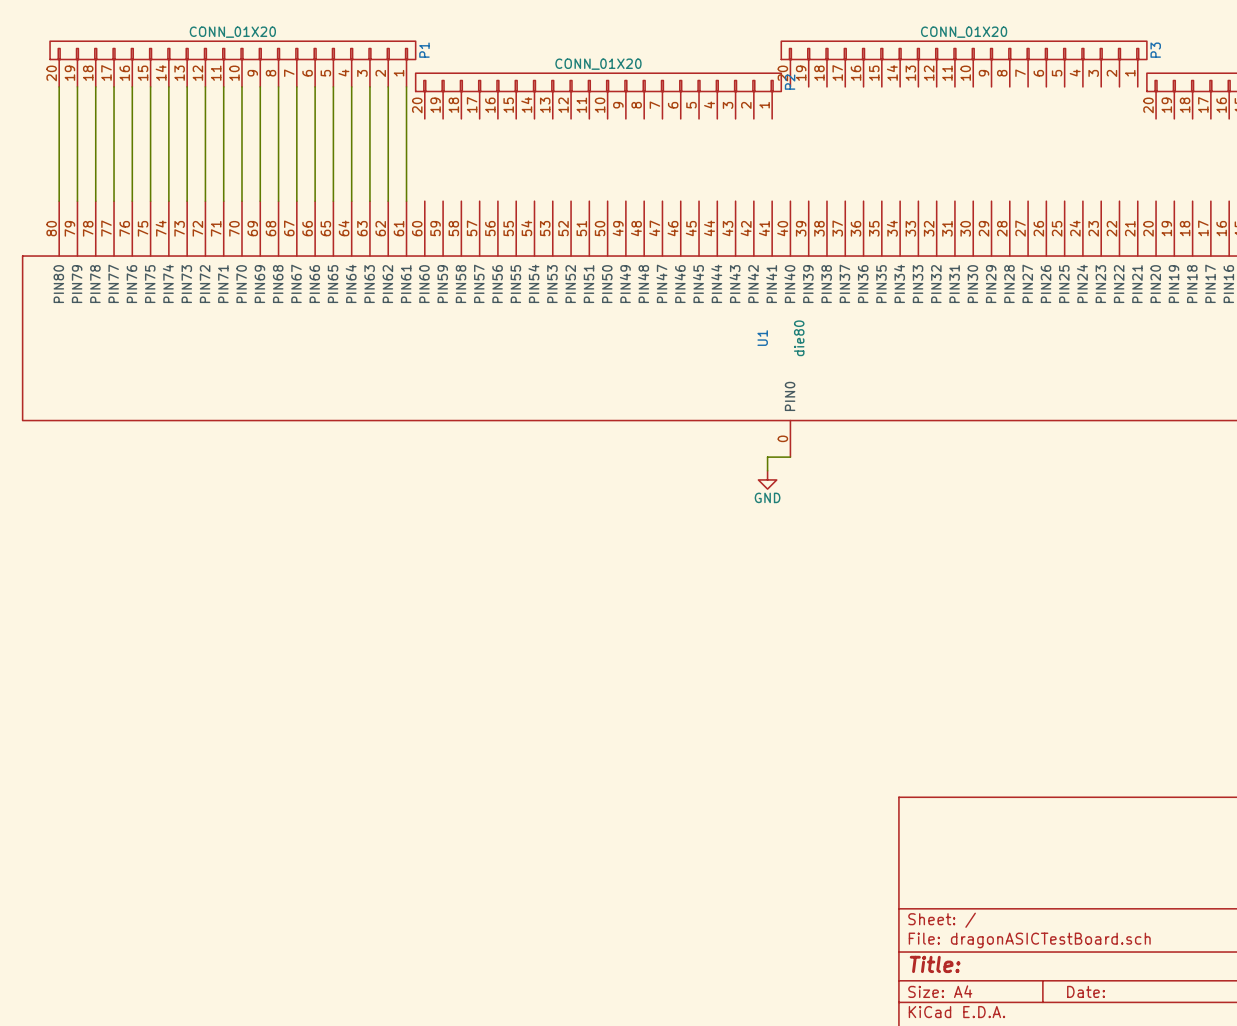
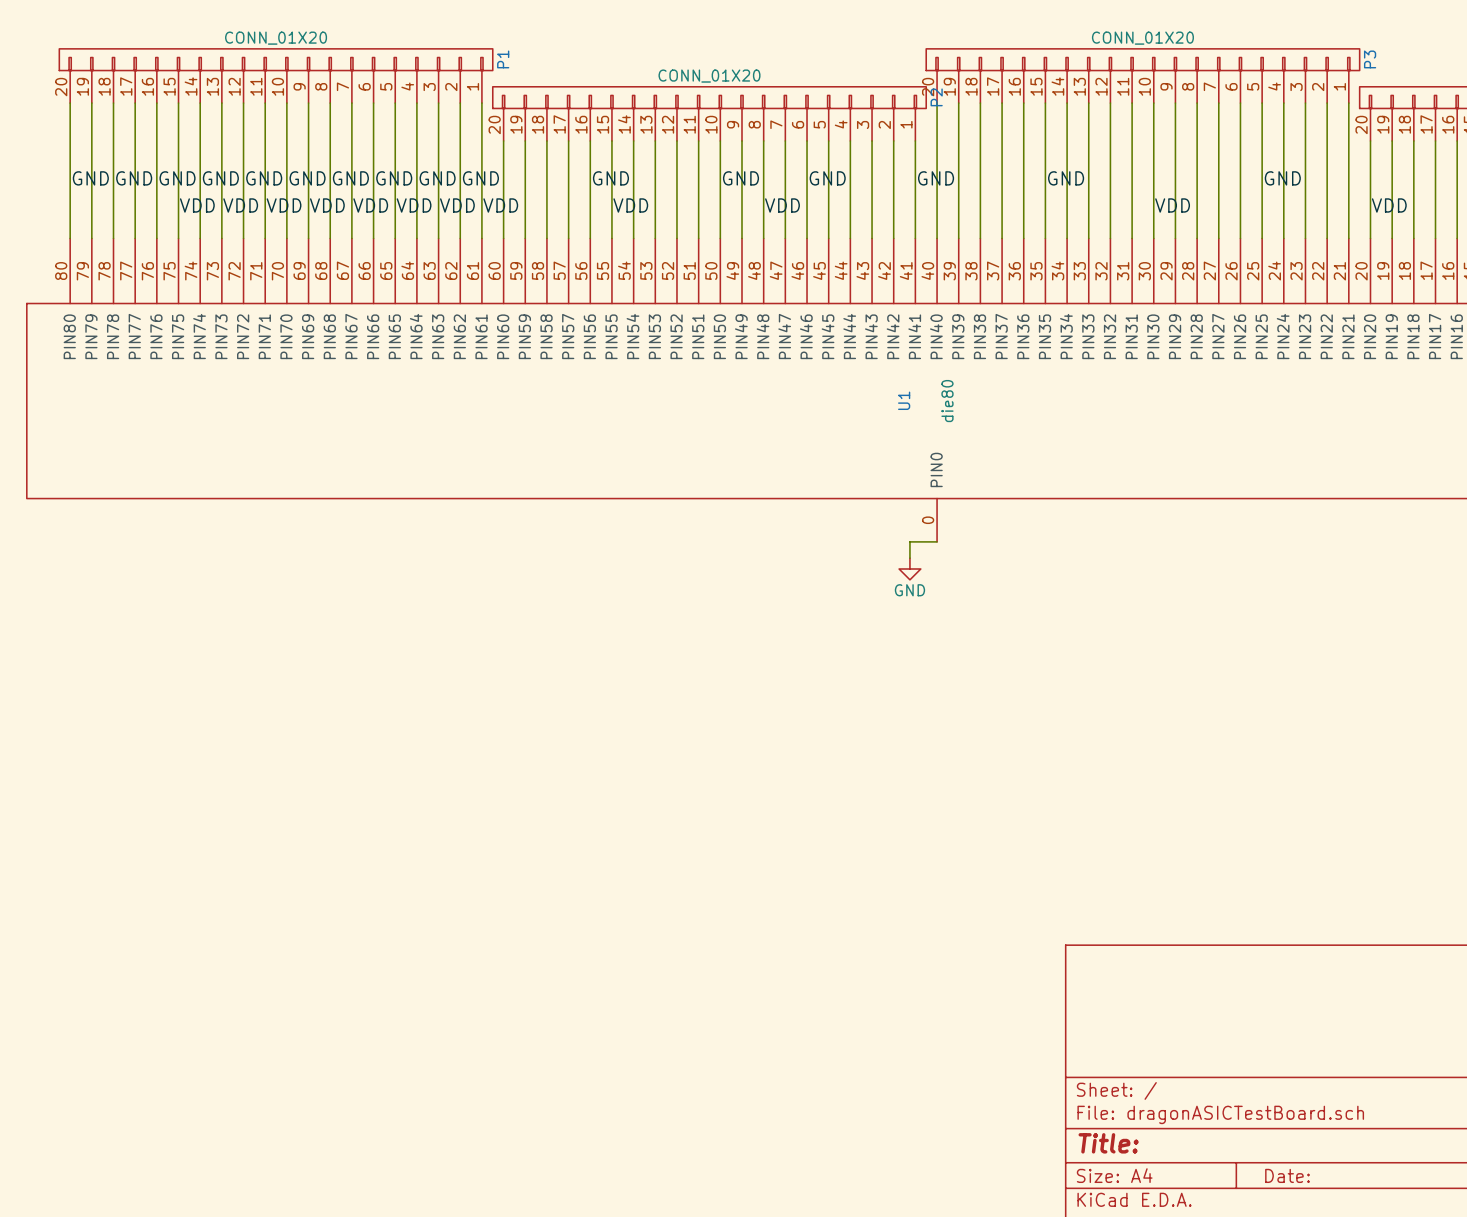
wire: none -> (937, 103) (937, 238)
wire: none -> (958, 103) (958, 238)
wire: none -> (980, 103) (980, 238)
wire: none -> (1002, 103) (1002, 238)
wire: none -> (1023, 103) (1023, 238)
wire: none -> (1045, 103) (1045, 238)
wire: none -> (1067, 103) (1067, 238)
wire: none -> (1088, 103) (1088, 238)
wire: none -> (1110, 103) (1110, 238)
wire: none -> (1132, 103) (1132, 238)
wire: none -> (1153, 103) (1153, 238)
wire: none -> (1175, 103) (1175, 238)
wire: none -> (1197, 103) (1197, 238)
wire: none -> (1218, 103) (1218, 238)
wire: none -> (1240, 103) (1240, 238)
wire: none -> (1262, 103) (1262, 238)
wire: none -> (1283, 103) (1283, 238)
wire: none -> (1305, 103) (1305, 238)
wire: none -> (1327, 103) (1327, 238)
wire: none -> (1348, 103) (1348, 238)
wire: none -> (503, 140) (503, 238)
wire: none -> (525, 140) (525, 238)
wire: none -> (546, 140) (546, 238)
wire: none -> (568, 140) (568, 238)
wire: none -> (590, 140) (590, 238)
wire: none -> (611, 140) (611, 238)
wire: none -> (633, 140) (633, 238)
wire: none -> (655, 140) (655, 238)
wire: none -> (676, 140) (676, 238)
wire: none -> (698, 140) (698, 238)
wire: none -> (720, 140) (720, 238)
wire: none -> (742, 140) (742, 238)
wire: none -> (763, 140) (763, 238)
wire: none -> (785, 140) (785, 238)
wire: none -> (807, 140) (807, 238)
wire: none -> (828, 140) (828, 238)
wire: none -> (850, 140) (850, 238)
wire: none -> (872, 140) (872, 238)
wire: none -> (893, 140) (893, 238)
wire: none -> (915, 140) (915, 238)
wire: none -> (1370, 140) (1370, 238)
wire: none -> (1392, 140) (1392, 238)
wire: none -> (1413, 140) (1413, 238)
wire: none -> (1435, 140) (1435, 238)
wire: none -> (1457, 140) (1457, 238)
label: none -> GND (90, 178)
label: none -> GND (134, 178)
label: none -> GND (177, 178)
label: none -> GND (220, 178)
label: none -> GND (264, 178)
label: none -> GND (307, 178)
label: none -> GND (350, 178)
label: none -> GND (394, 178)
label: none -> GND (437, 178)
label: none -> GND (480, 178)
label: none -> GND (610, 178)
label: none -> GND (740, 178)
label: none -> GND (827, 178)
label: none -> GND (936, 178)
label: none -> GND (1066, 178)
label: none -> GND (1282, 178)
label: none -> VDD (197, 205)
label: none -> VDD (240, 205)
label: none -> VDD (284, 205)
label: none -> VDD (327, 205)
label: none -> VDD (370, 205)
label: none -> VDD (414, 205)
label: none -> VDD (457, 205)
label: none -> VDD (500, 205)
label: none -> VDD (630, 205)
label: none -> VDD (782, 205)
label: none -> VDD (1172, 205)
label: none -> VDD (1389, 205)

